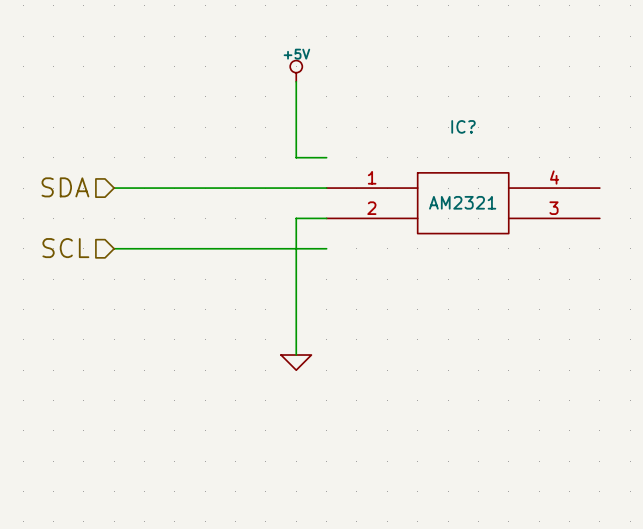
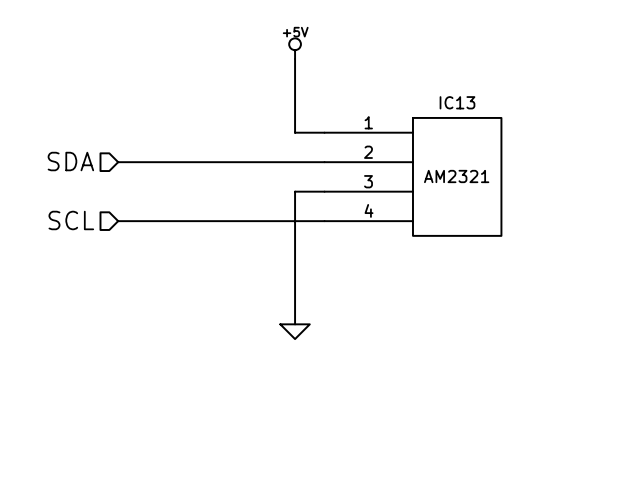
IC13: none -> AM2321 (412, 176)
IC?: AM2321 (463, 203) -> none

